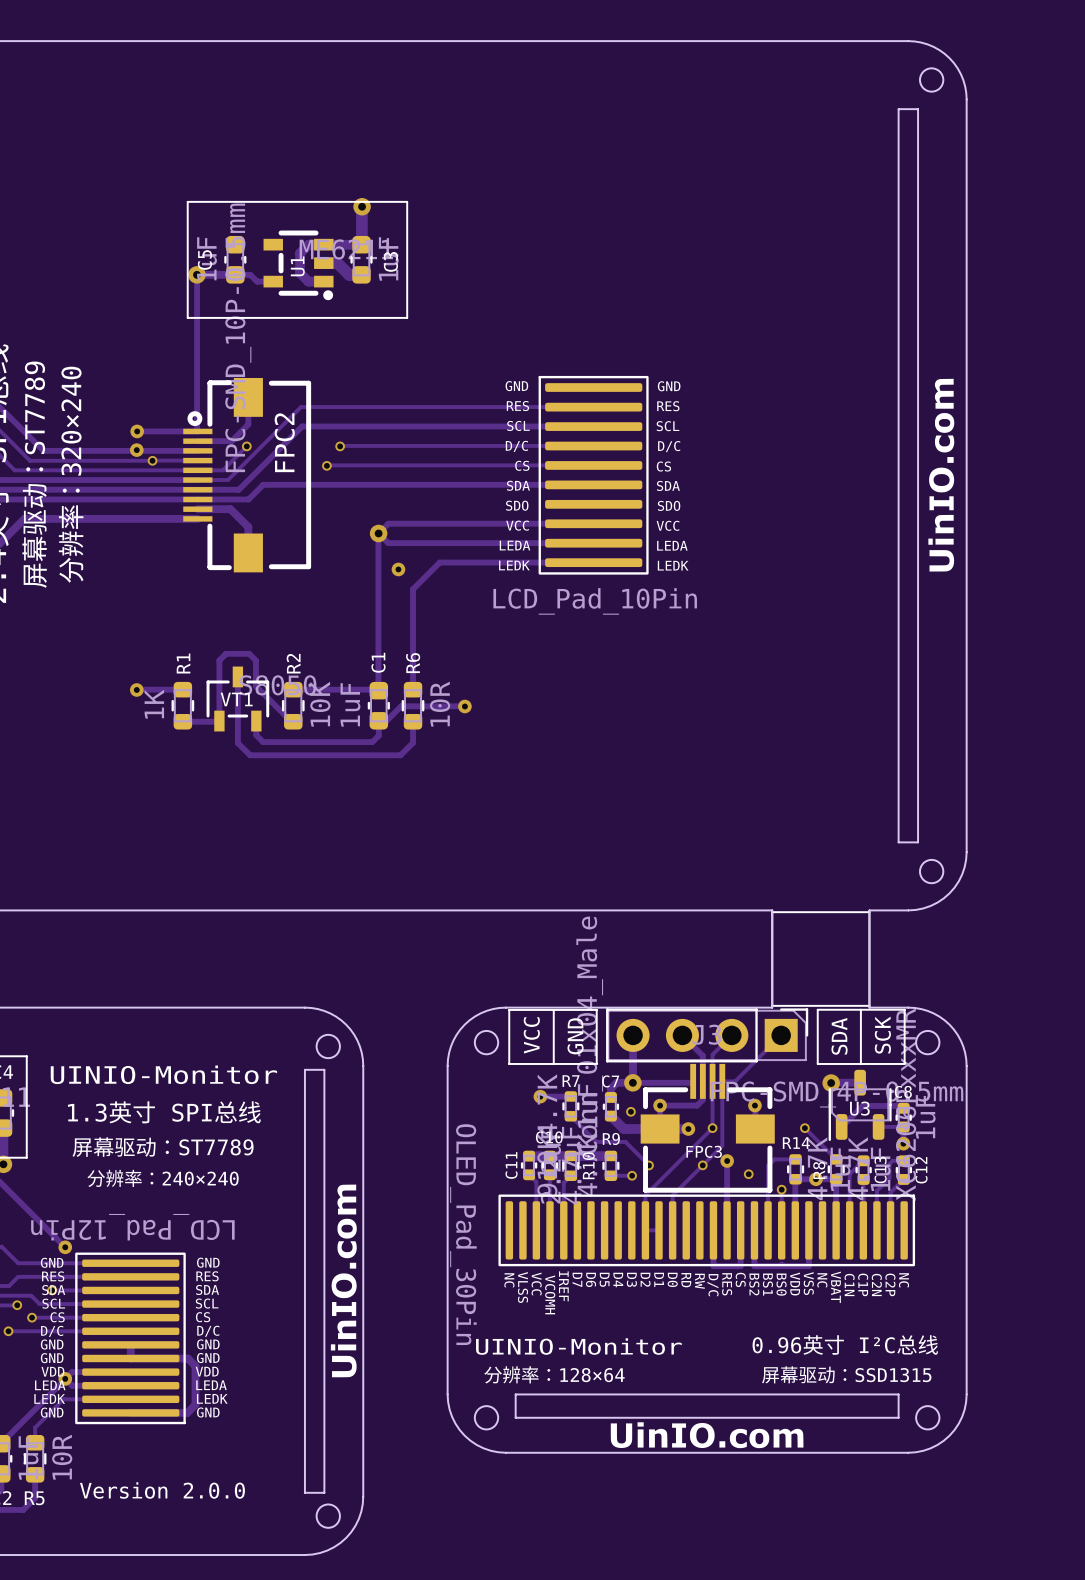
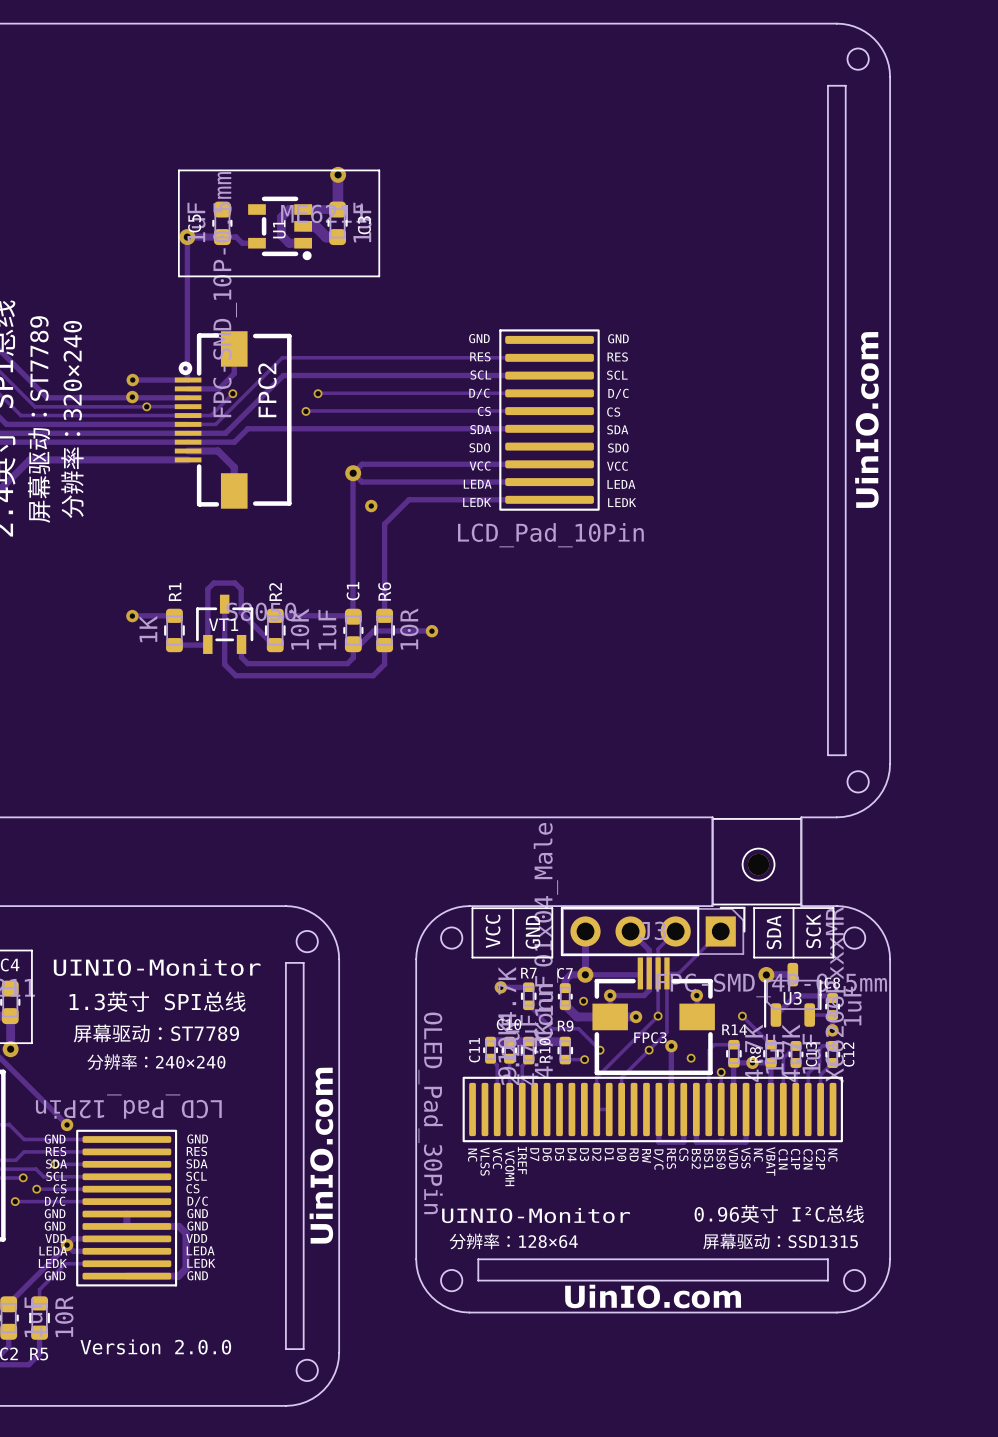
part: none -> (758, 864)

